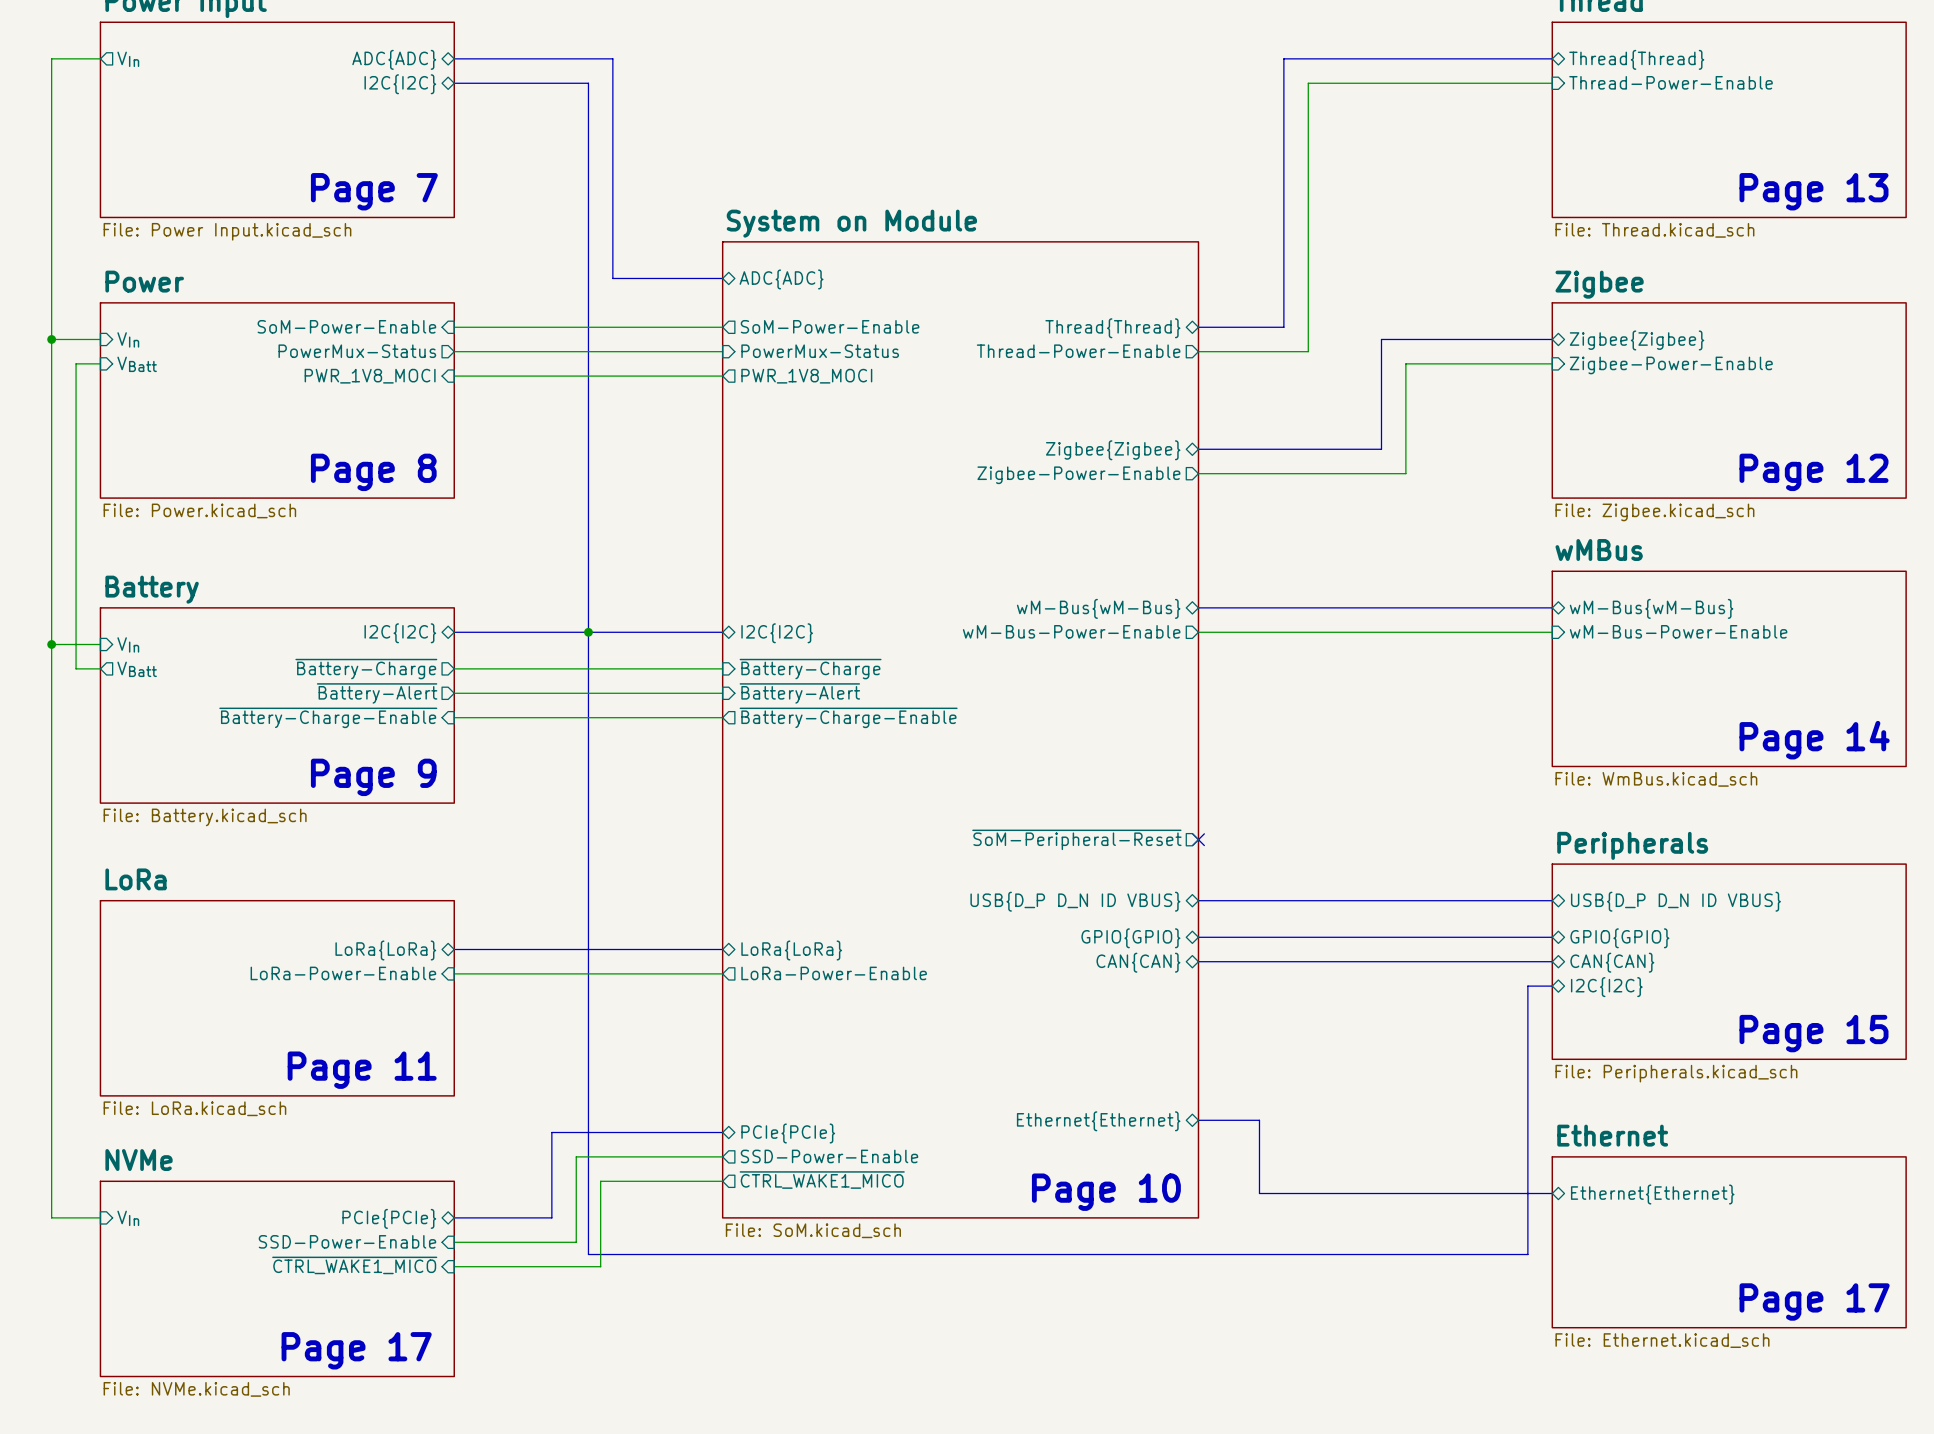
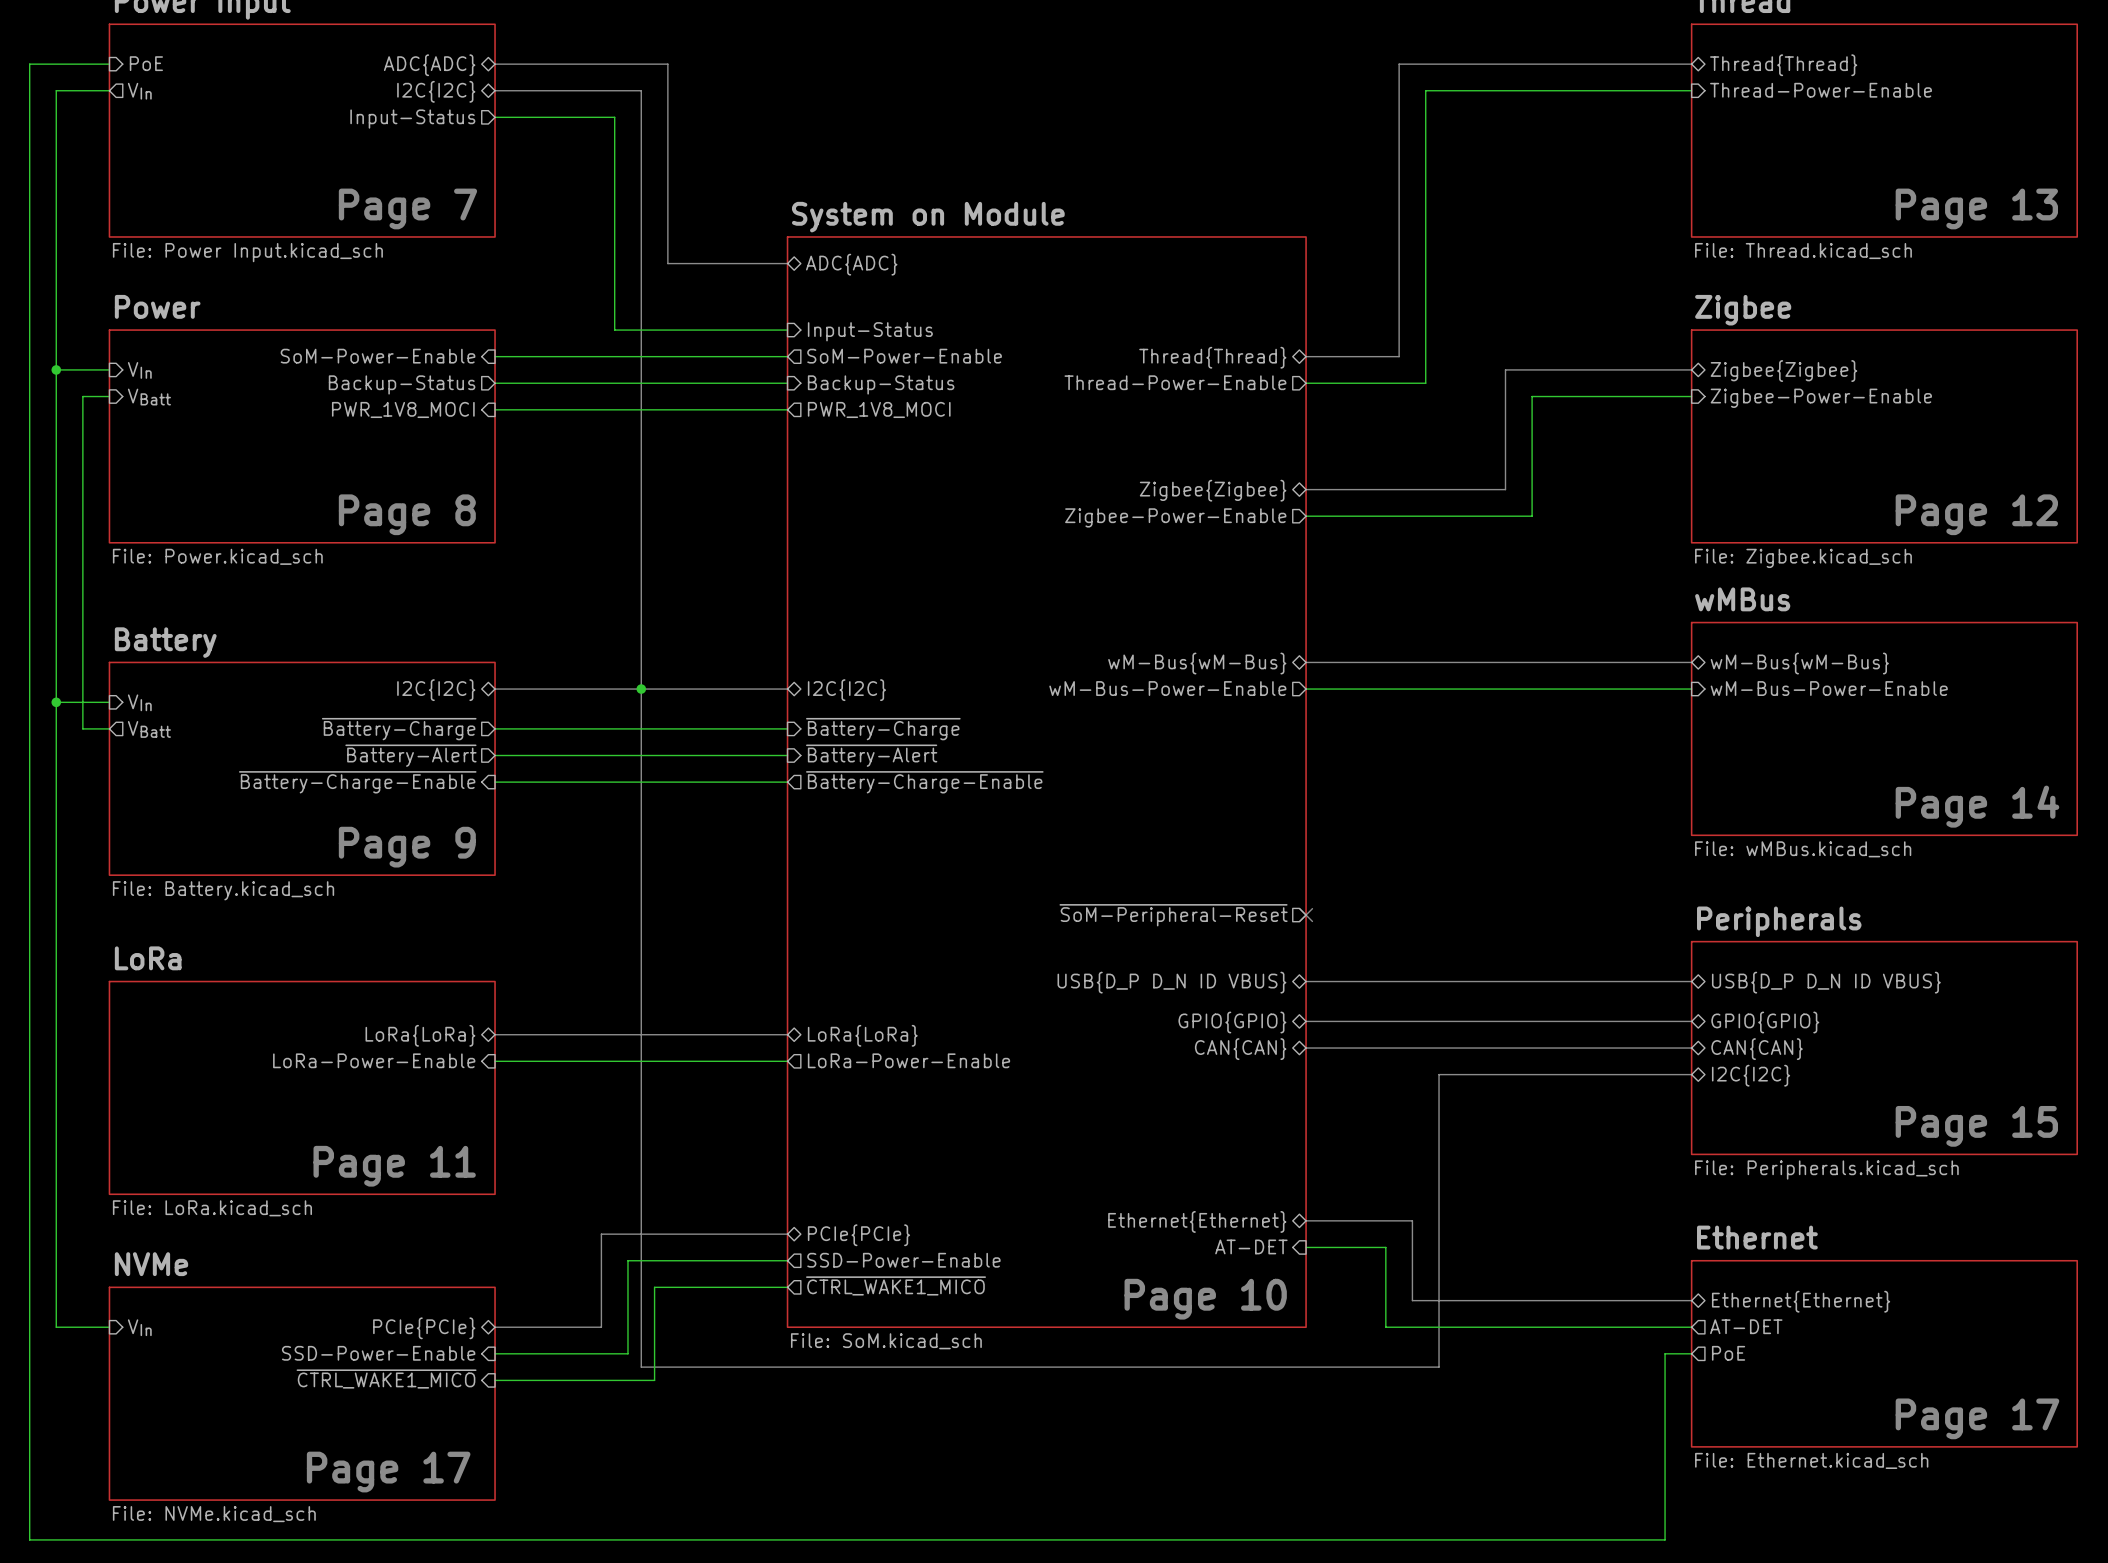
wire: (51, 58) (51, 83) -> (109, 90) (56, 90)
wire: none -> (56, 64) (29, 64) (29, 1539) (1665, 1539) (1665, 1353) (1691, 1353)
sheet pin shape: output (128, 59) -> input (146, 63)
sheet pin: VIn (128, 59) -> PoE (146, 63)
sheet pin: none -> VIn (139, 91)
wire: none -> (495, 117) (614, 117) (614, 330) (787, 330)
sheet pin: none -> Input-Status (412, 119)
bus: (612, 241) (612, 278) (722, 278) -> (667, 263) (787, 263)
sheet pin position: ADC{ADC} (781, 279) -> ADC{ADC} (851, 264)
sheet pin: none -> Input-Status (870, 331)
sheet pin: PowerMux-Status (357, 351) -> Backup-Status (402, 384)
sheet pin: PowerMux-Status (820, 351) -> Backup-Status (881, 384)
sheet System on Module: none -> File: SoM.kicad_sch (1046, 782)
sheet System on Module: File: SoM.kicad_sch (960, 729) -> none
sheet wMBus value: File: WmBus.kicad_sch (1656, 779) -> File: wMBus.kicad_sch (1803, 849)
bus: (1527, 986) (1527, 1254) (1320, 1254) -> (1665, 1074) (1439, 1074) (1439, 1367)
bus: (1259, 1120) (1259, 1193) (1296, 1193) -> (1372, 1220) (1412, 1220) (1412, 1300)
sheet pin: none -> AT-DET (1251, 1246)
wire: none -> (1306, 1247) (1385, 1247) (1385, 1327) (1691, 1327)
sheet pin: none -> AT-DET (1746, 1326)
sheet pin: none -> PoE (1728, 1353)

